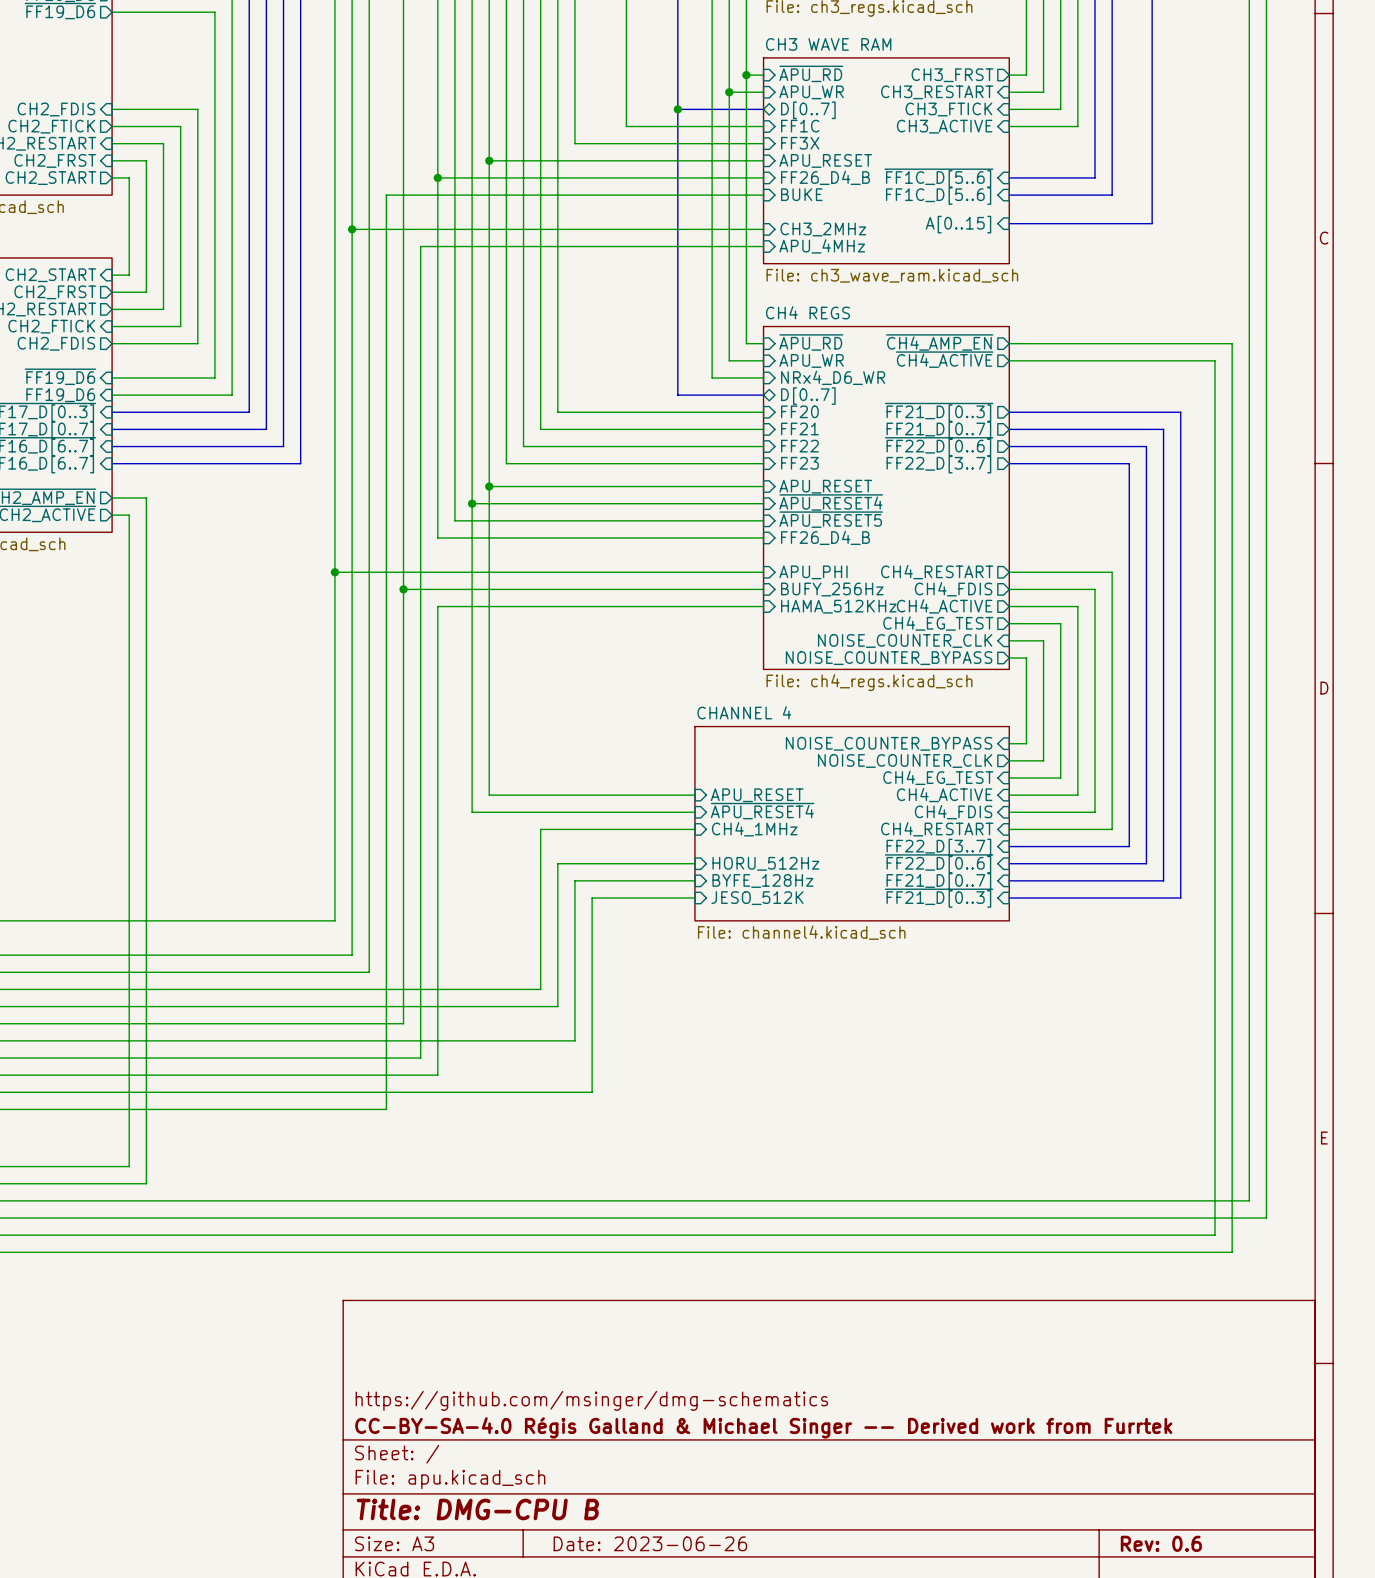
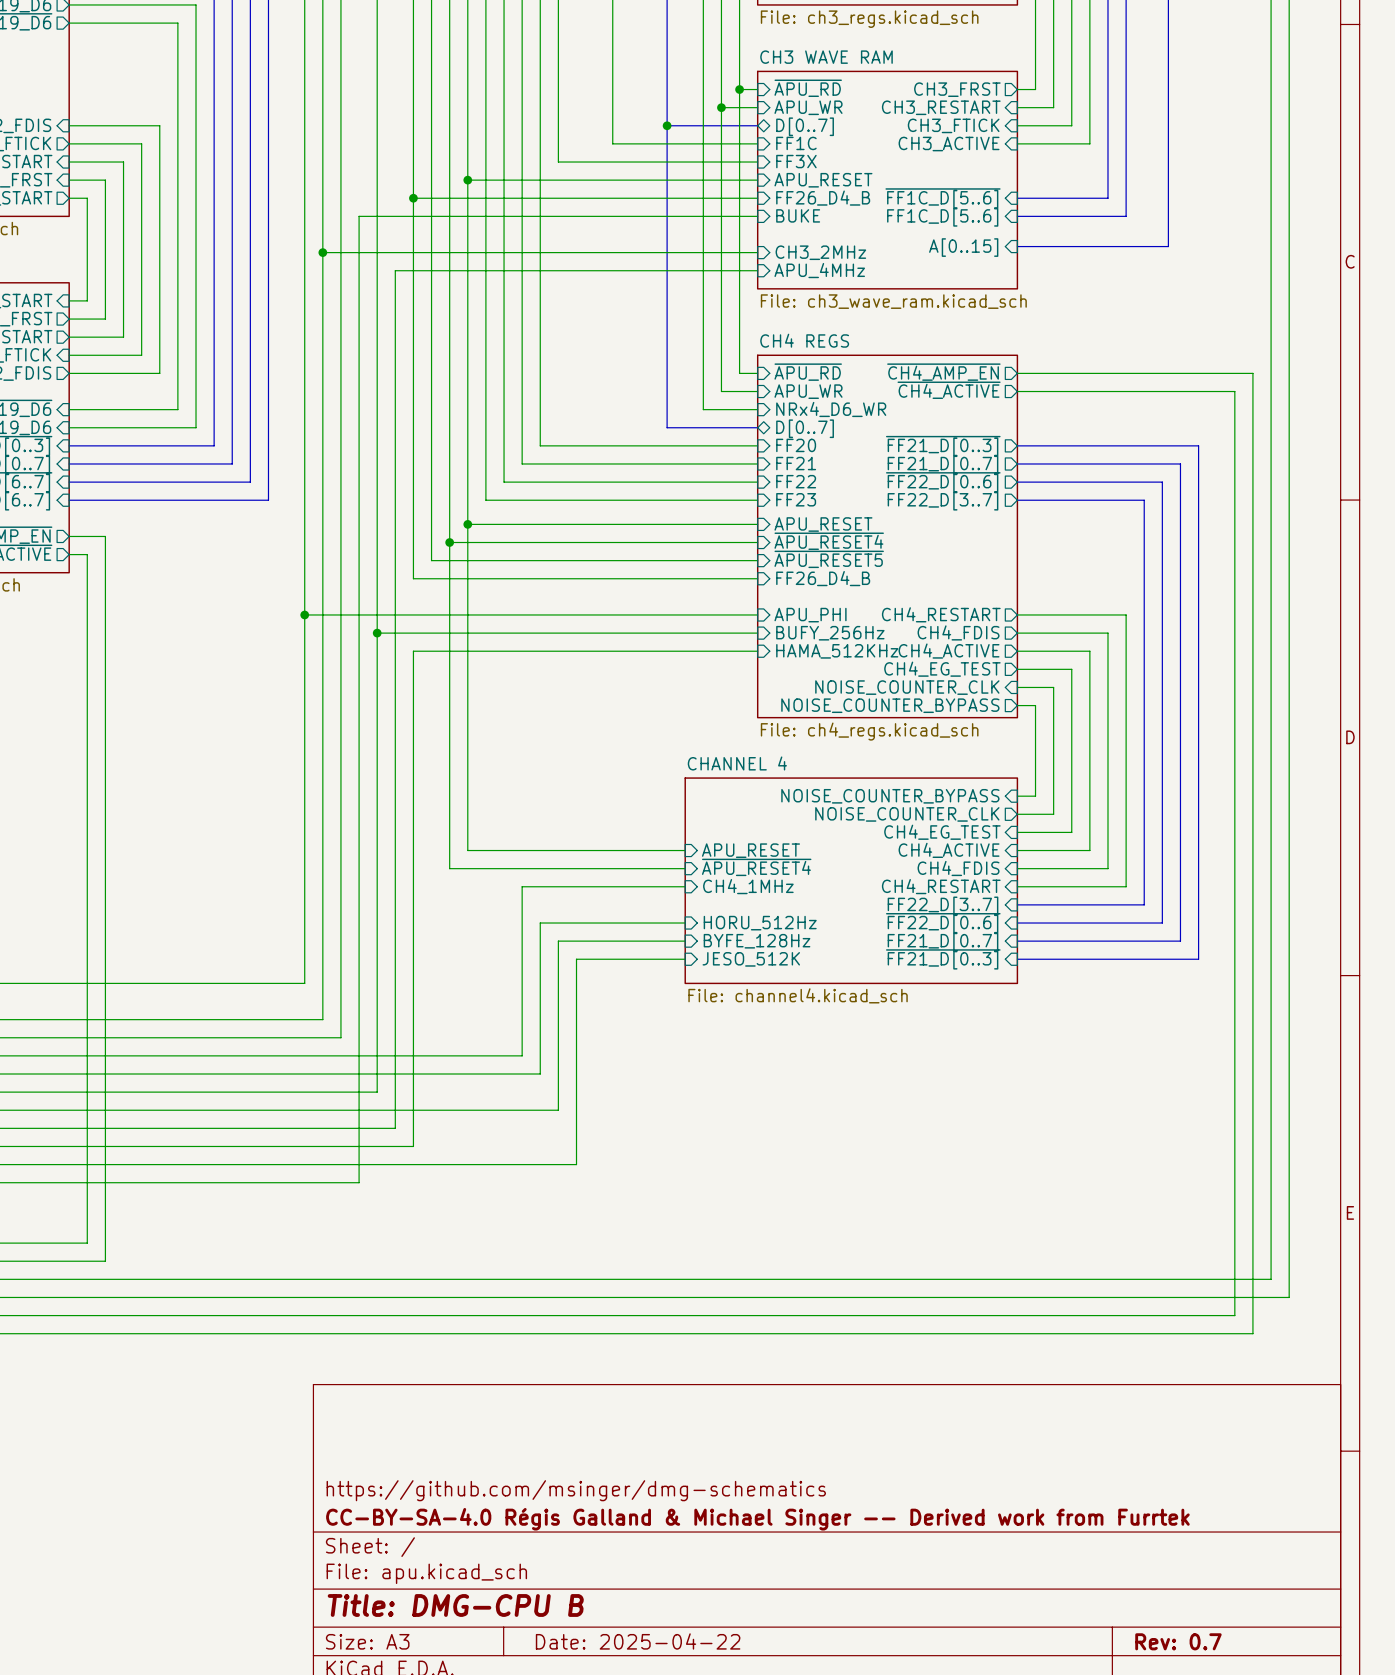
title block: Date: 2023-06-26 (650, 1543) -> Date: 2025-04-22 (638, 1641)
title block: Rev: 0.6 (1161, 1543) -> Rev: 0.7 (1178, 1641)

